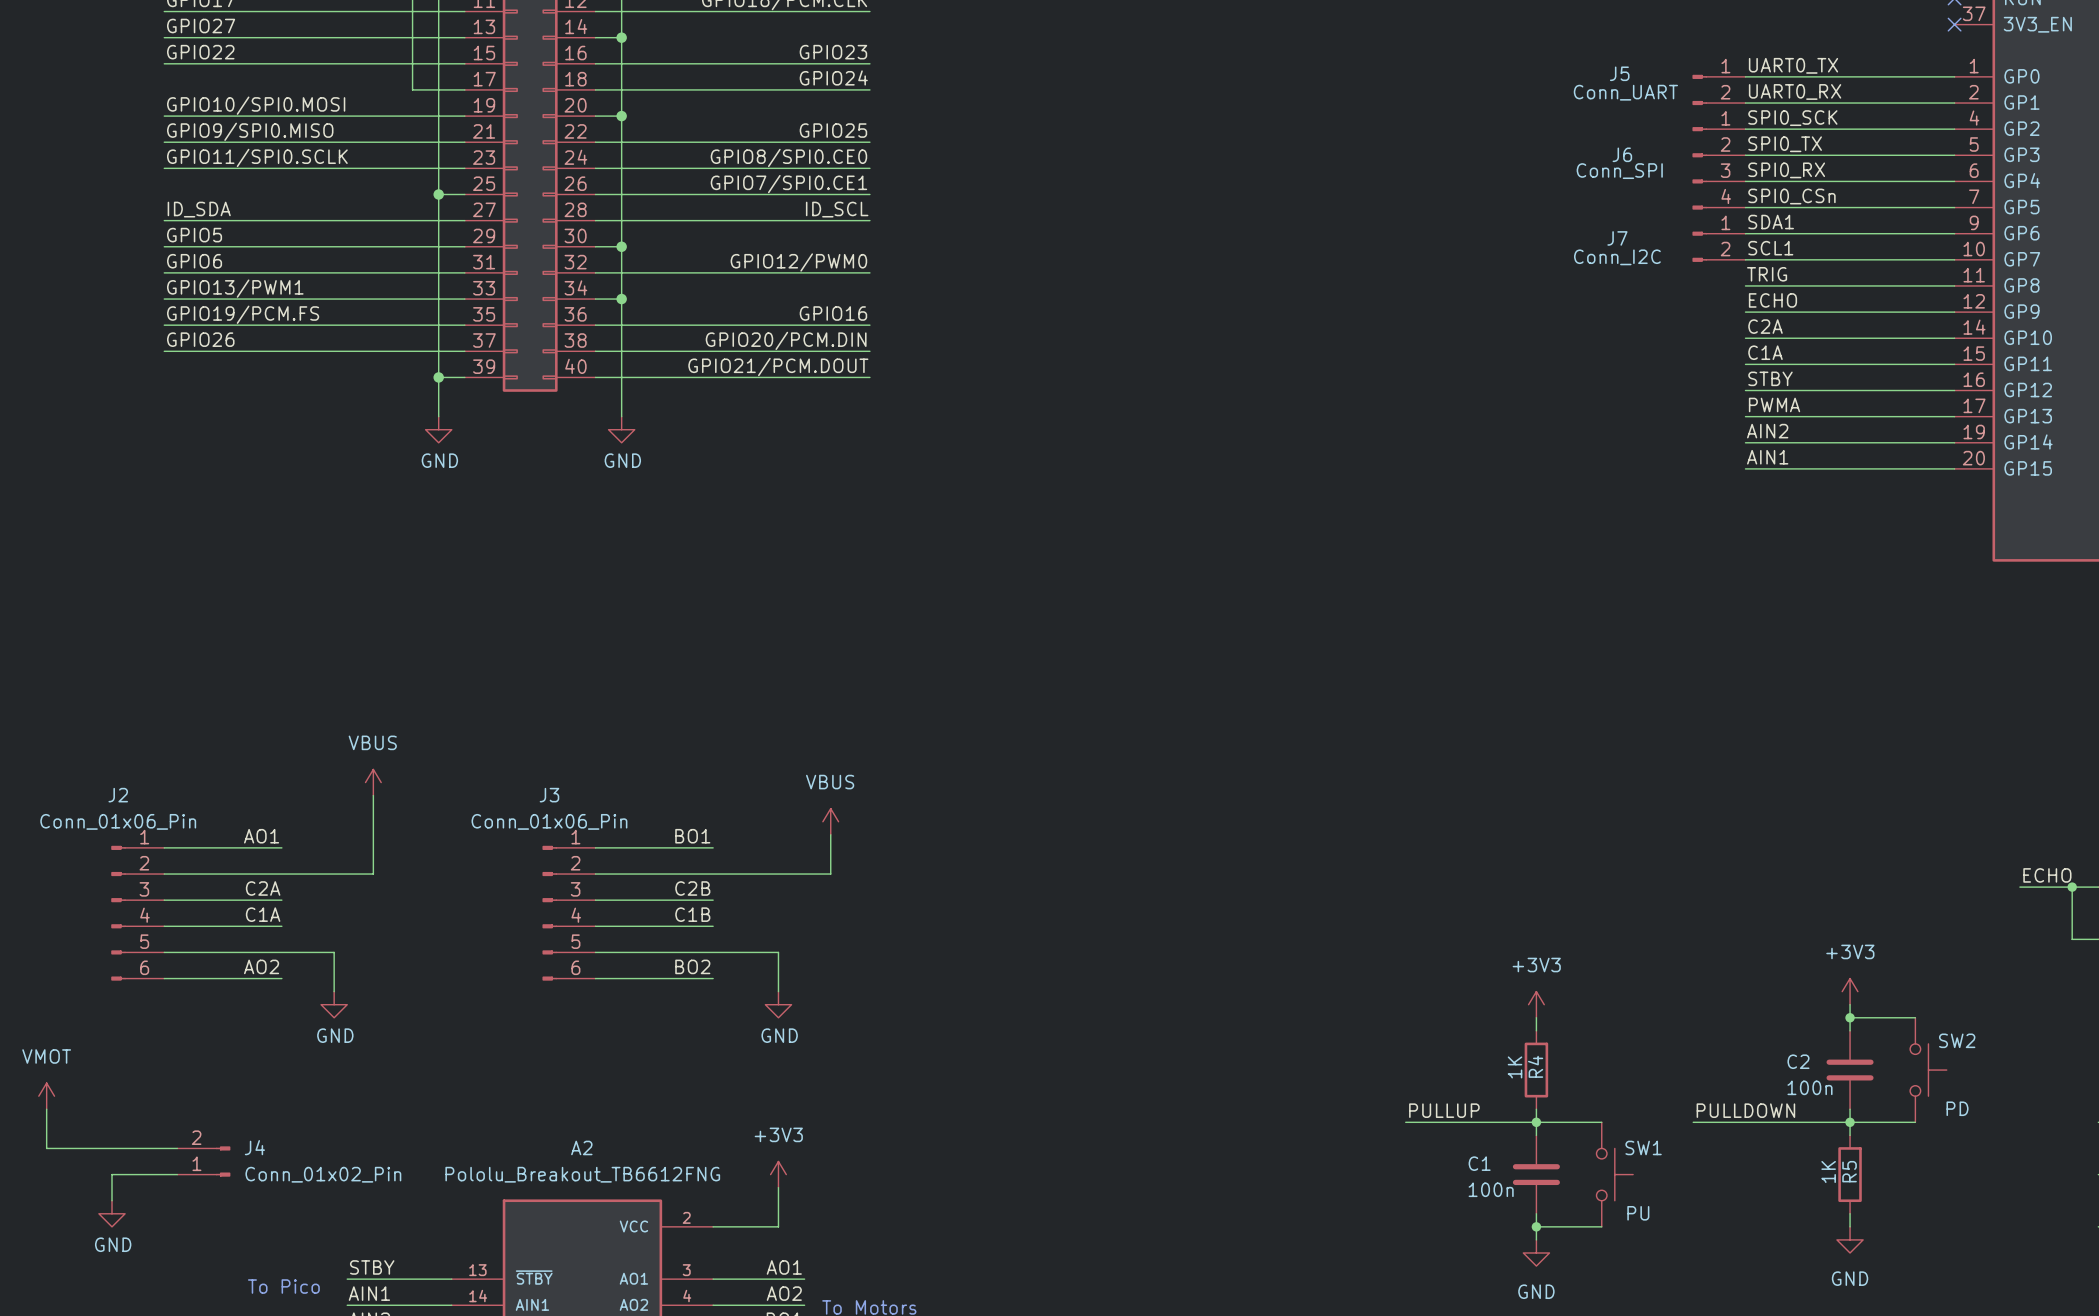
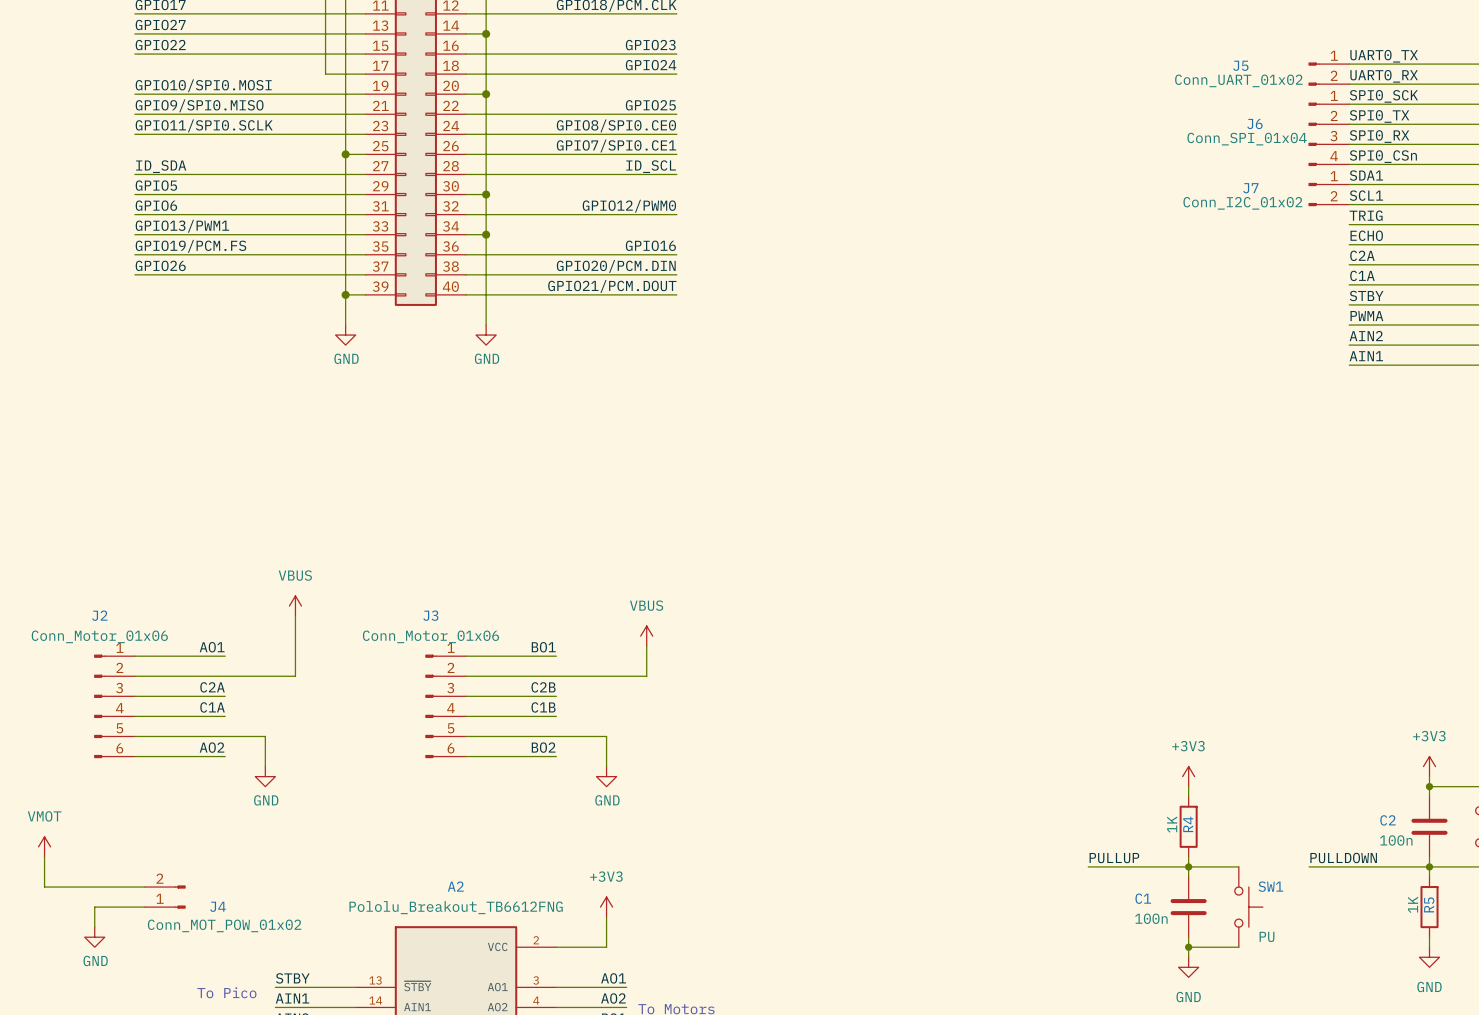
J5 name position: J5 (1619, 73) -> J5 (1240, 65)
J5 value: Conn_UART (1625, 92) -> Conn_UART_01x02 (1238, 80)
J6 value: Conn_SPI (1619, 171) -> Conn_SPI_01x04 (1247, 139)
J7 value: Conn_I2C (1617, 257) -> Conn_I2C_01x02 (1242, 203)
J2 value: Conn_01x06_Pin (118, 821) -> Conn_Motor_01x06 (99, 636)
J3 value: Conn_01x06_Pin (549, 821) -> Conn_Motor_01x06 (430, 636)
J4 name position: J4 (254, 1147) -> J4 (218, 906)
J4 value: Conn_01x02_Pin (323, 1174) -> Conn_MOT_POW_01x02 (224, 925)

